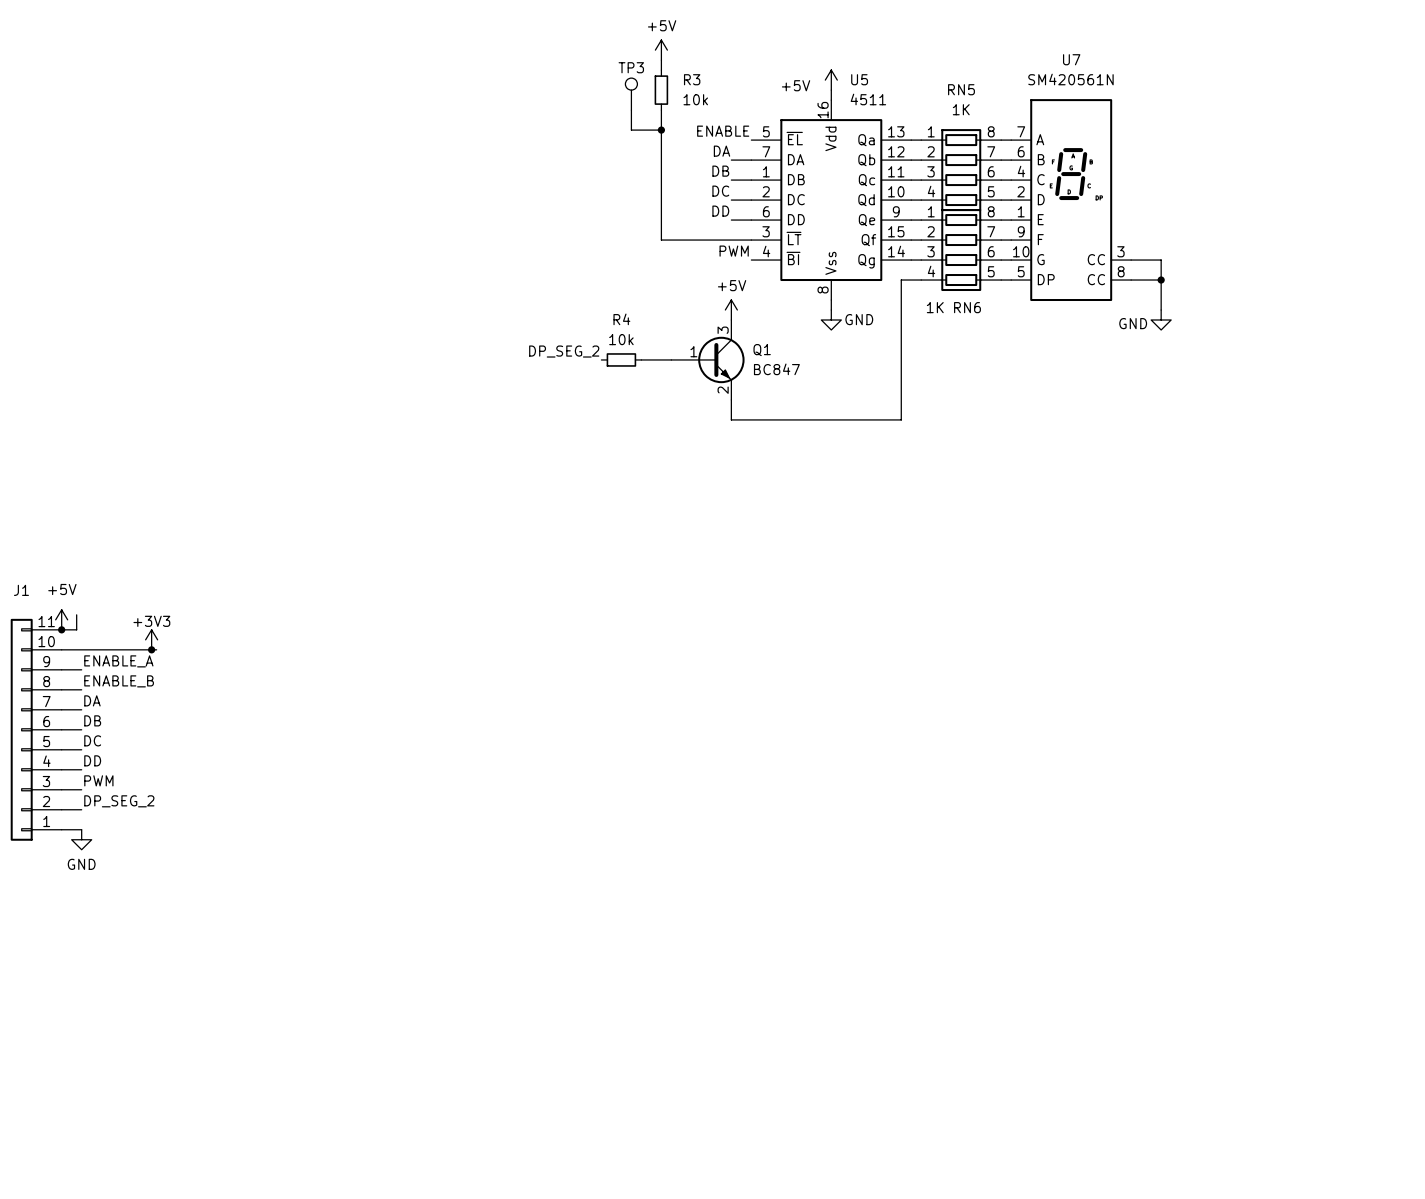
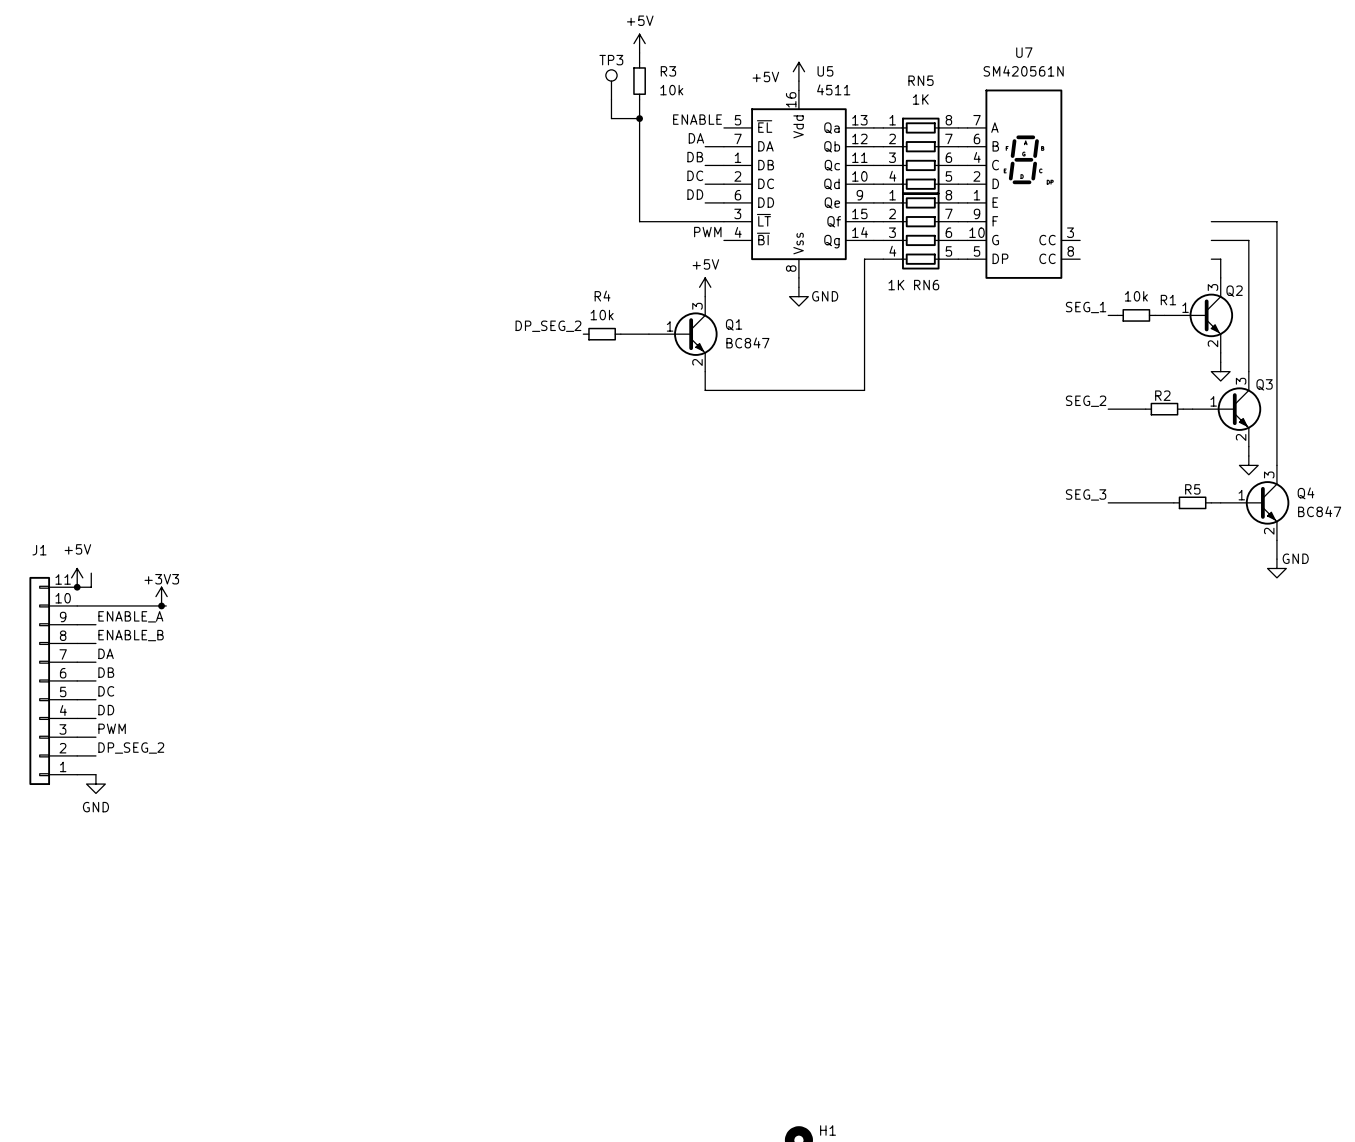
wire: none -> (1211, 221) (1276, 221) (1276, 465)
wire: (1131, 260) (1161, 260) (1161, 310) -> none
wire: none -> (1211, 240) (1248, 240) (1248, 371)
wire: (1131, 280) (1161, 280) -> none
junction: (1161, 280) -> none
wire: none -> (1211, 259) (1220, 259) (1220, 277)
power symbol: GND (1161, 319) -> none
label: none -> SEG_1 (1086, 307)
wire: none -> (1108, 315) (1117, 315)
R1: none -> 10k (1136, 315)
wire: none -> (1155, 315) (1164, 315)
Q2: none -> (1198, 315)
wire: none -> (1220, 352) (1220, 362)
power symbol: none -> (1220, 371)
label: none -> SEG_2 (1086, 401)
wire: none -> (1108, 409) (1145, 409)
R2: none -> (1164, 409)
wire: none -> (1183, 409) (1192, 409)
Q3: none -> (1226, 409)
wire: none -> (1248, 446) (1248, 456)
power symbol: none -> (1248, 465)
label: none -> SEG_3 (1086, 494)
wire: none -> (1108, 502) (1173, 502)
R5: none -> (1192, 502)
wire: none -> (1211, 502) (1220, 502)
Q4: none -> BC847 (1255, 502)
wire: none -> (1276, 540) (1276, 559)
power symbol: none -> GND (1276, 568)

